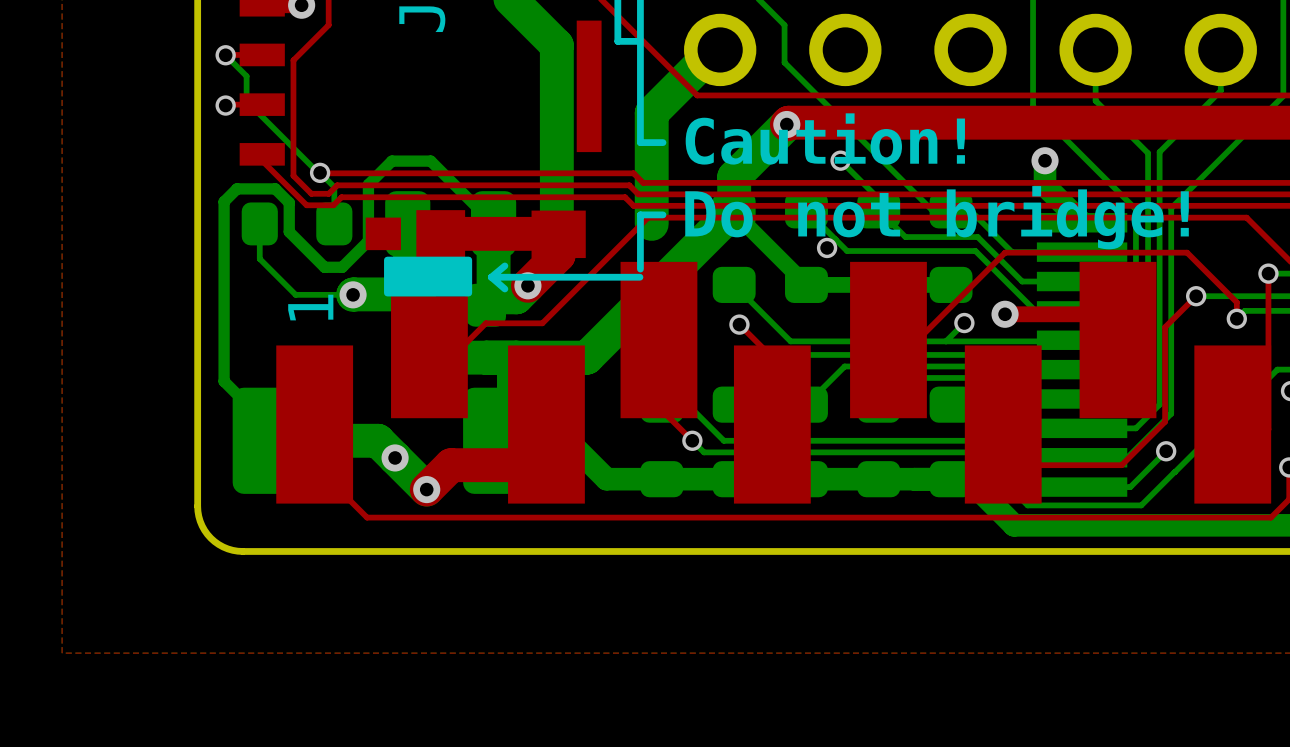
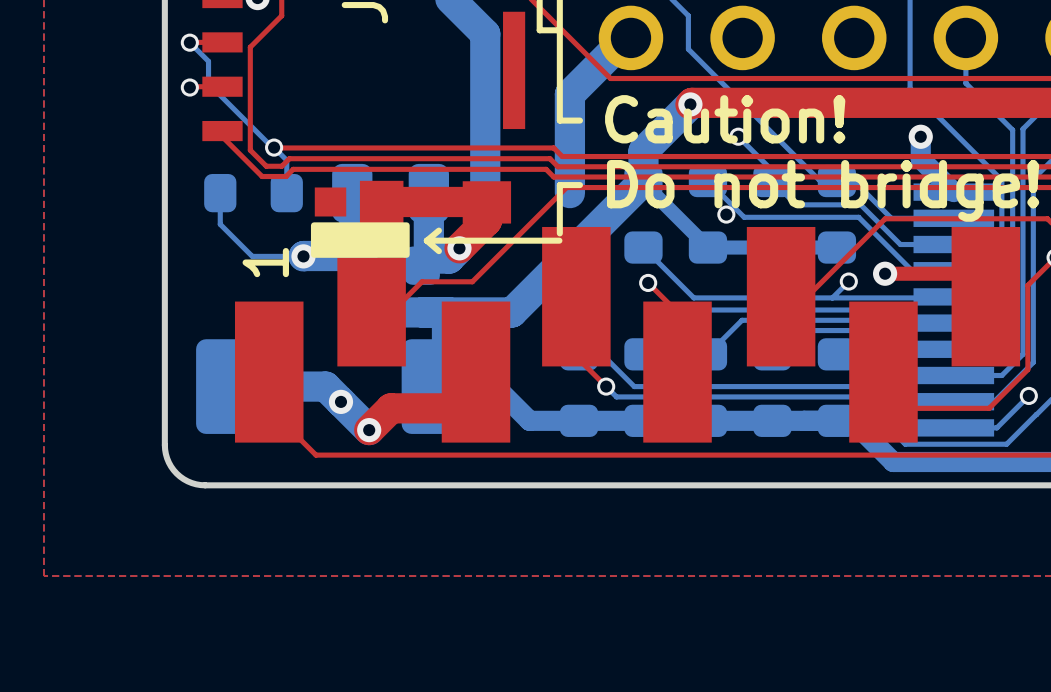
bottom track: (493, 223) (430, 161) (391, 161) (368, 184) (368, 241) (342, 267) (324, 267) (289, 231) (289, 202) (275, 188) (236, 188) (224, 201) (224, 381) (283, 440) -> none
drawing shape: [384, 256, 473, 297] -> [310, 222, 410, 258]

